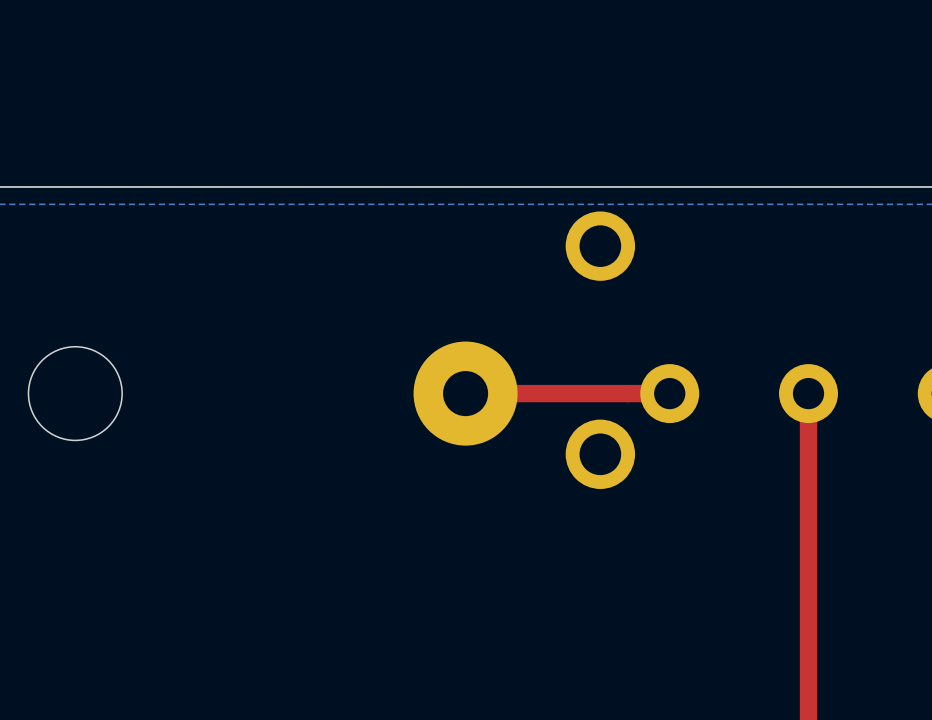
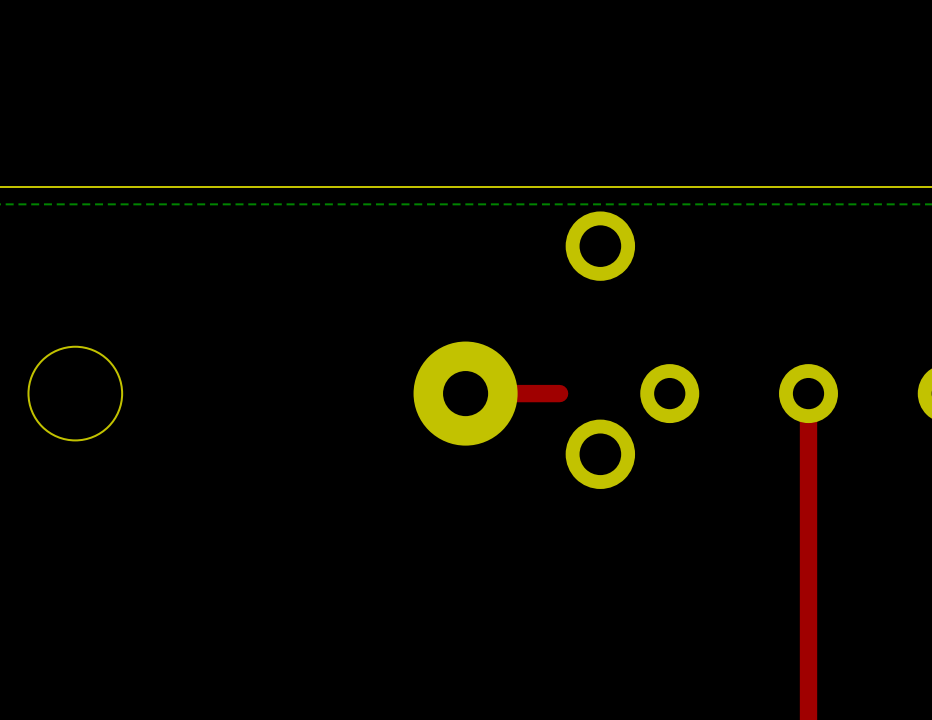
top track: (669, 393) (559, 393) -> none

